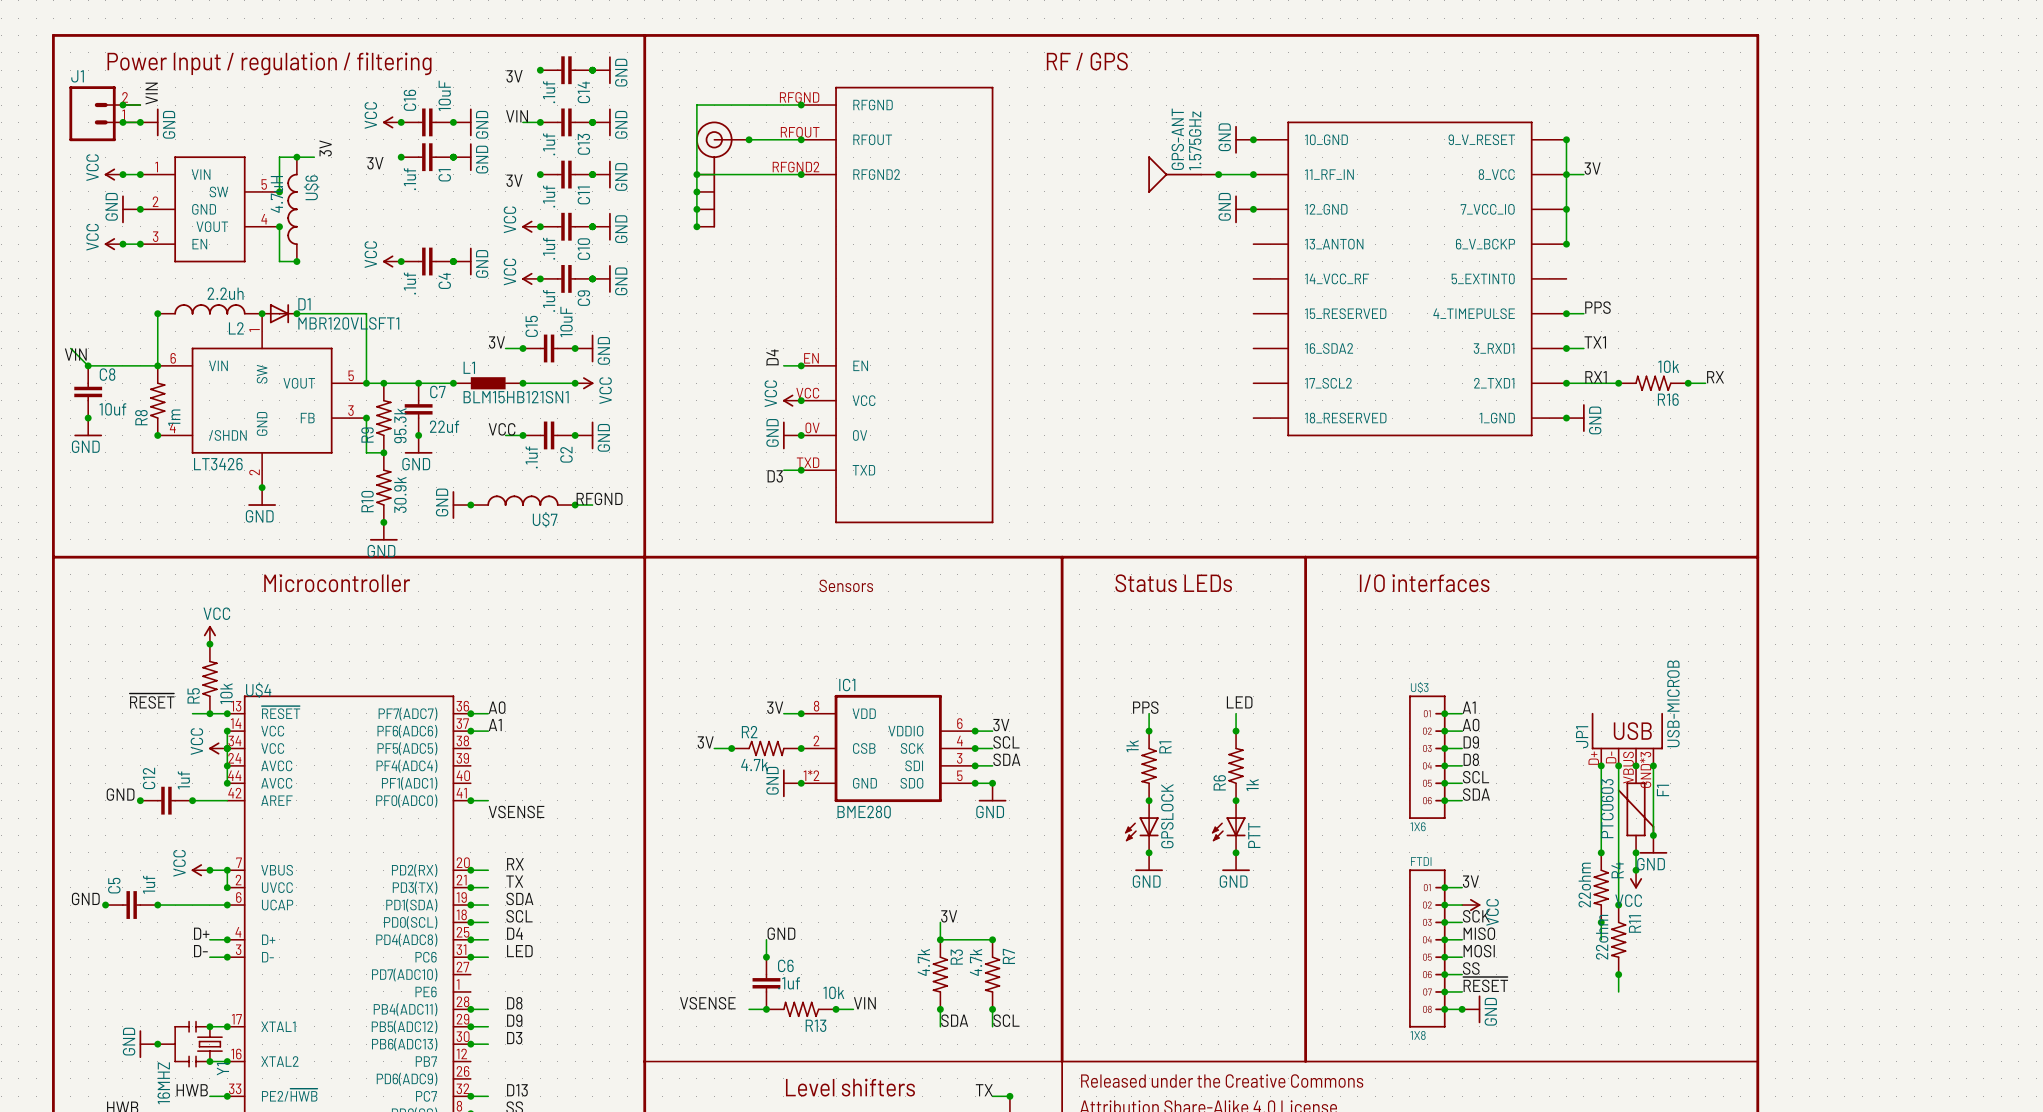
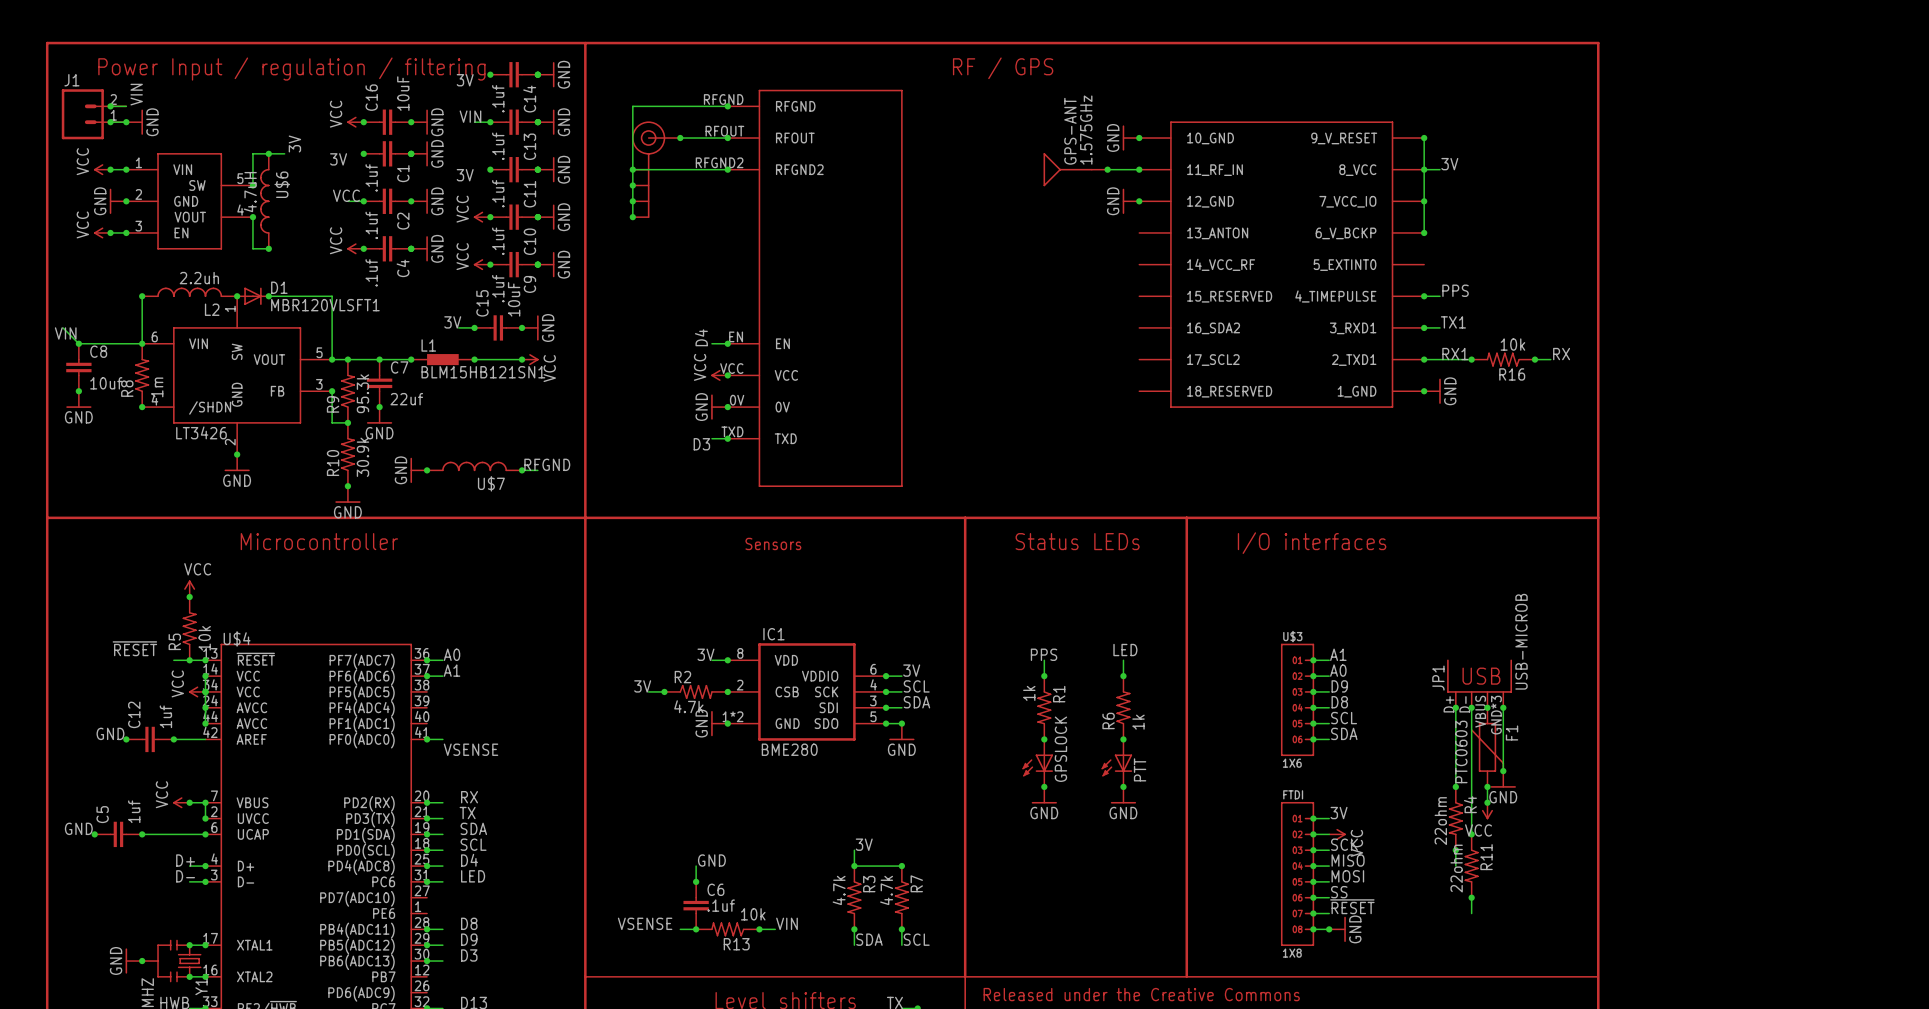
label: none -> VCC (346, 195)
wire: none -> (347, 201) (363, 201)
junction: none -> (363, 201)
junction: none -> (411, 201)
power symbol: none -> GND (419, 201)
label: VCC (502, 429) -> none
wire: (505, 435) (522, 435) -> none
junction: (522, 435) -> none
C2 position: (549, 435) -> (387, 201)
junction: (575, 435) -> none
power symbol: GND (584, 435) -> none

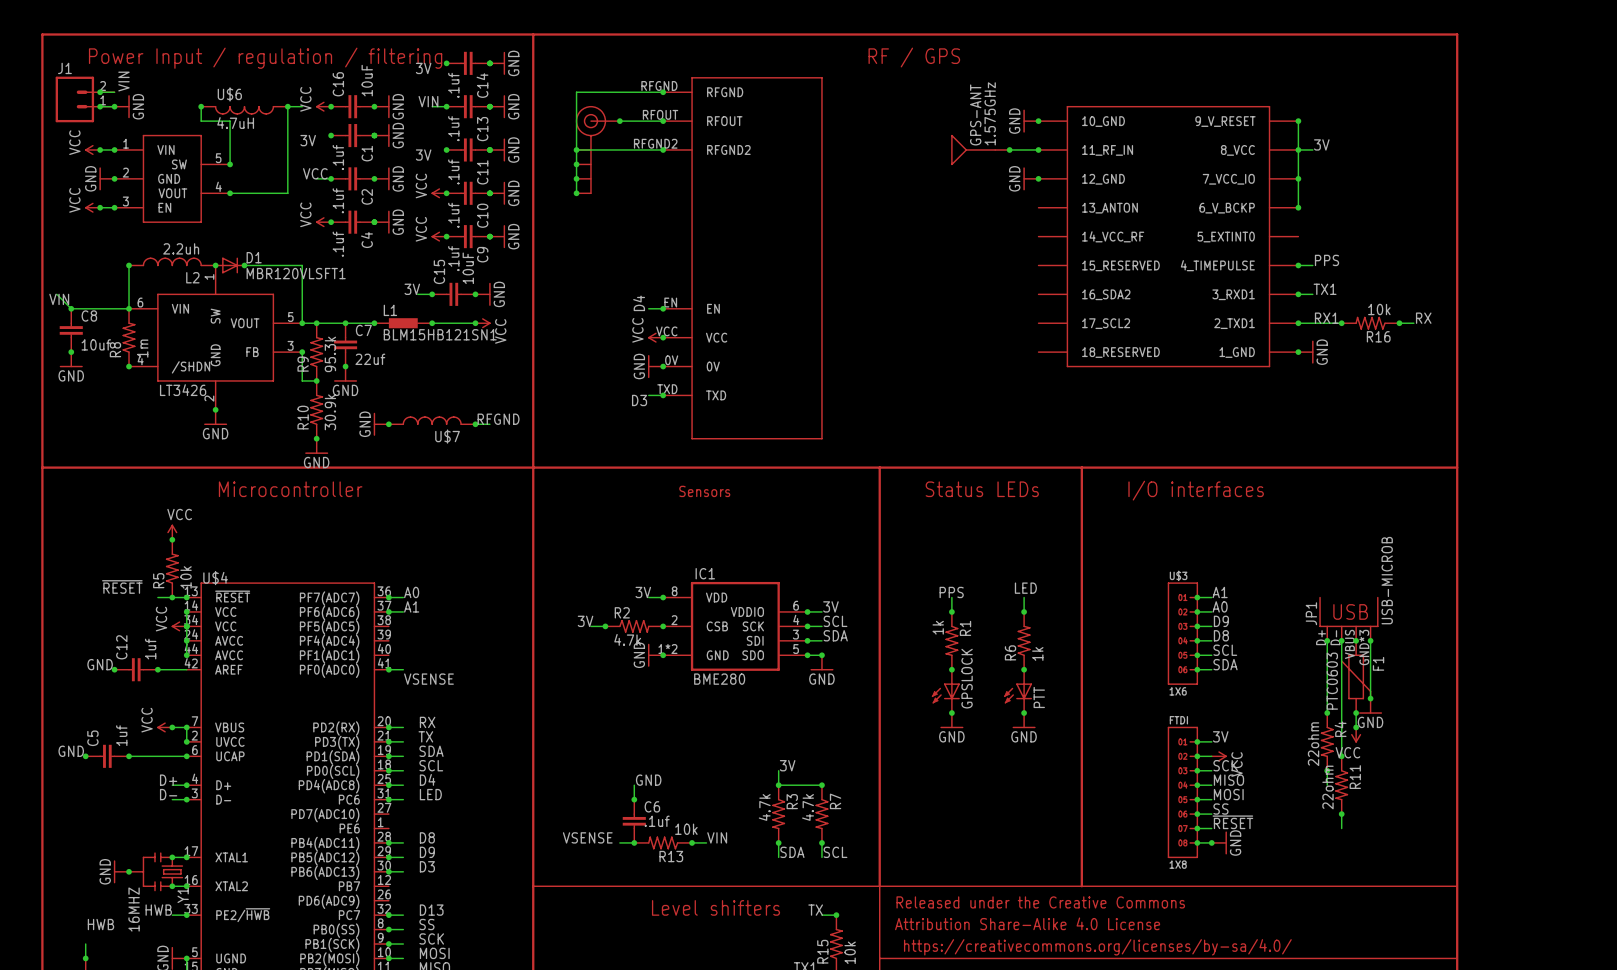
junction: none -> (201, 106)
junction: none -> (287, 106)
label: 3V (294, 144) -> none
wire: (252, 153) (284, 153) -> (230, 135) (230, 121) (201, 121) (201, 106)
junction: (268, 153) -> none
U$6 rotation: 0° (264, 201) -> 90° counterclockwise (244, 110)
U$6 position: (264, 201) -> (244, 110)
wire: (252, 217) (252, 248) (268, 248) -> (230, 193) (287, 193) (287, 106) (302, 106)
junction: (268, 248) -> none

